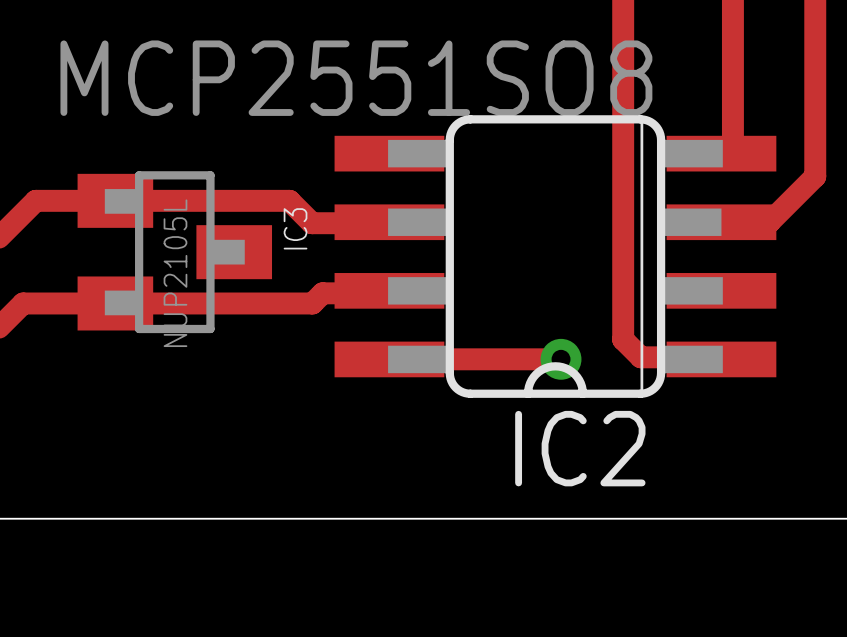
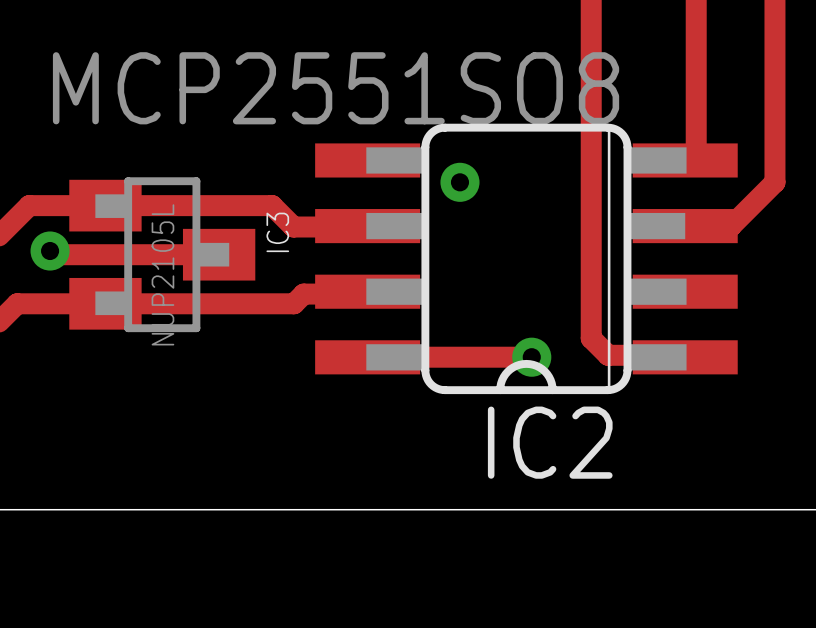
via: none -> (459, 182)
track: none -> (50, 251) (53, 254) (219, 254)
via: none -> (50, 251)

